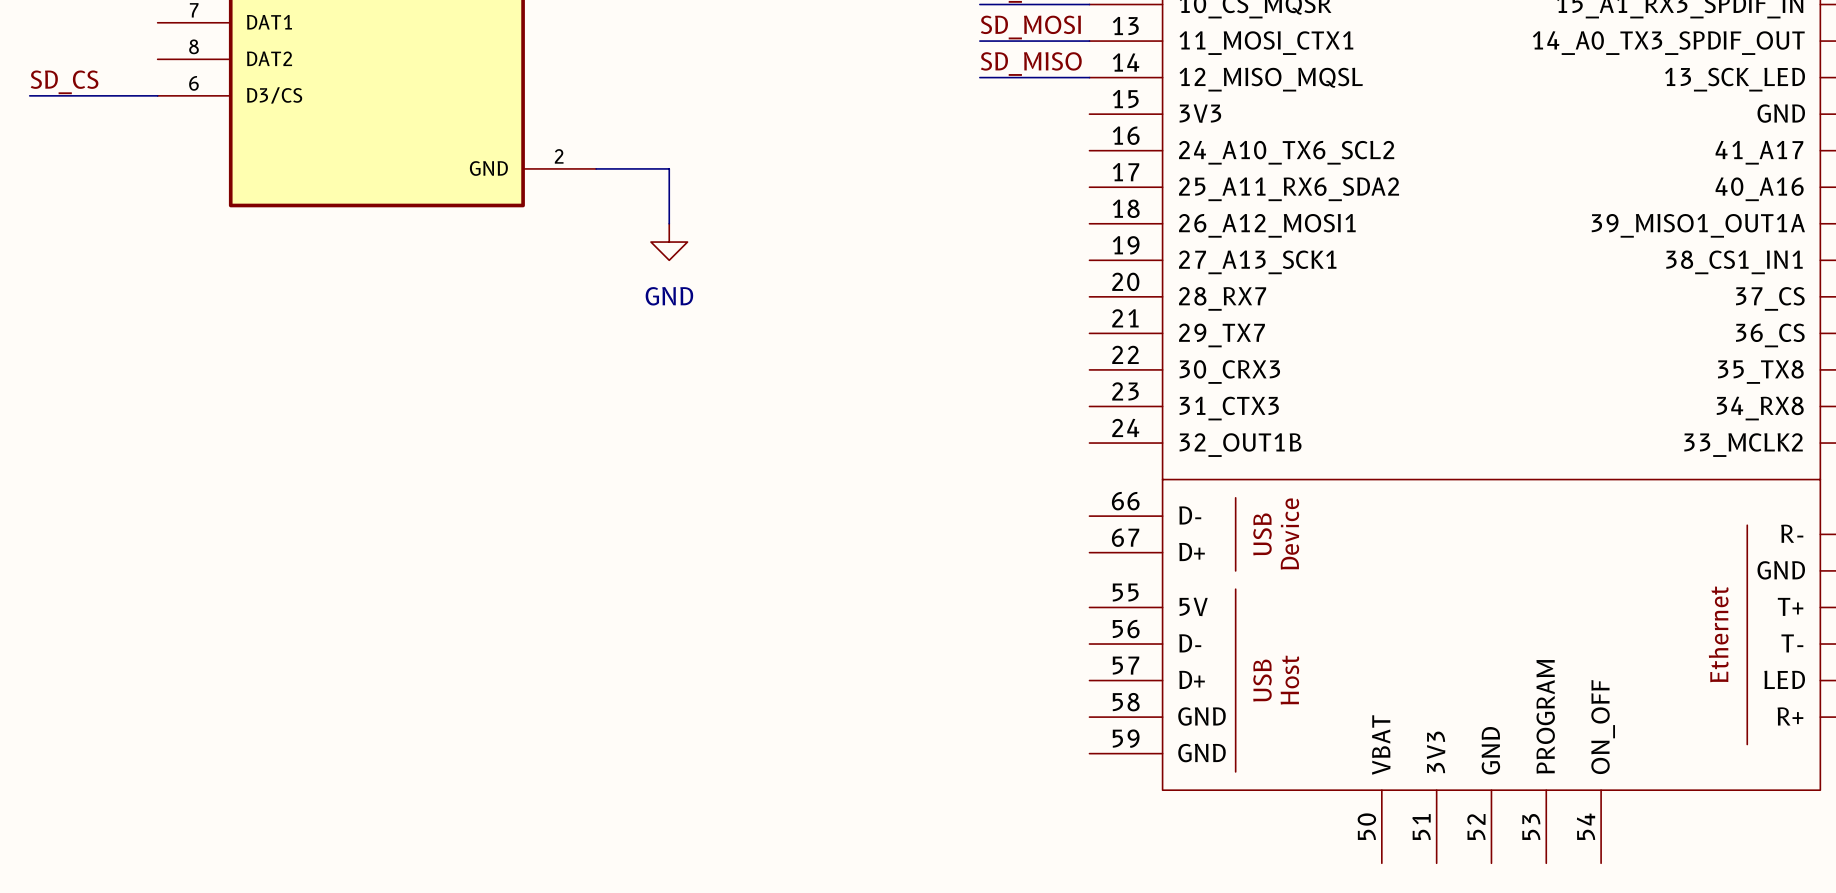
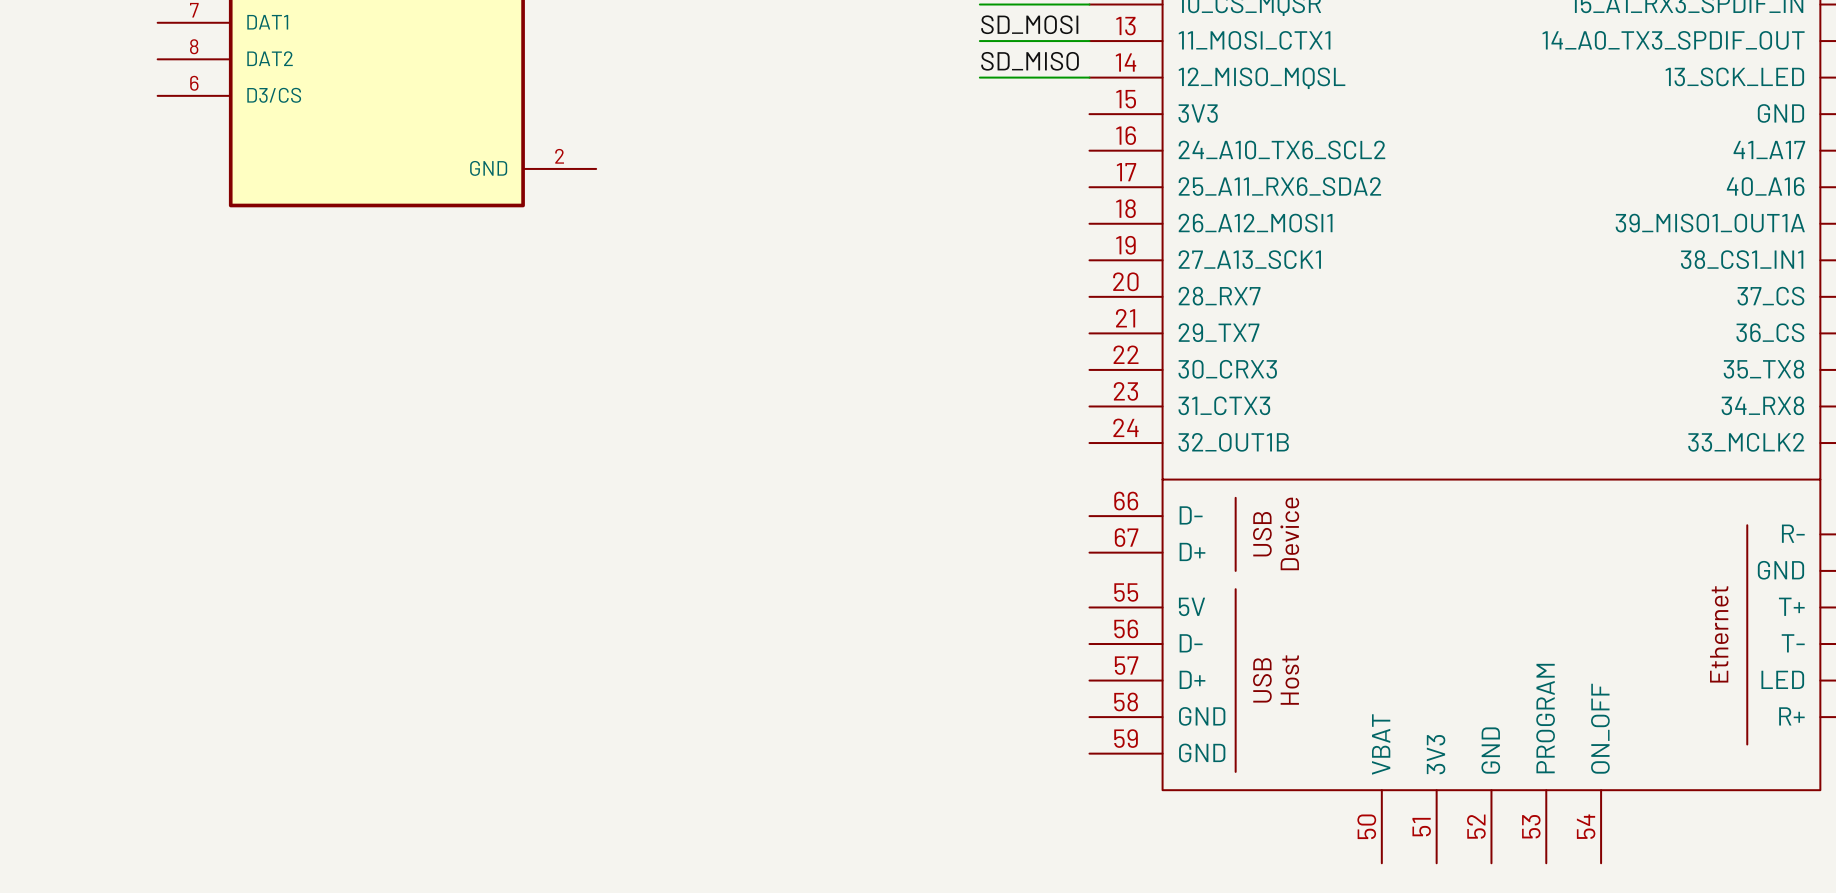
label: SD_CS (64, 82) -> none
wire: (29, 95) (157, 95) -> none
wire: (596, 168) (669, 168) (669, 223) -> none
power symbol: GND (669, 242) -> none

